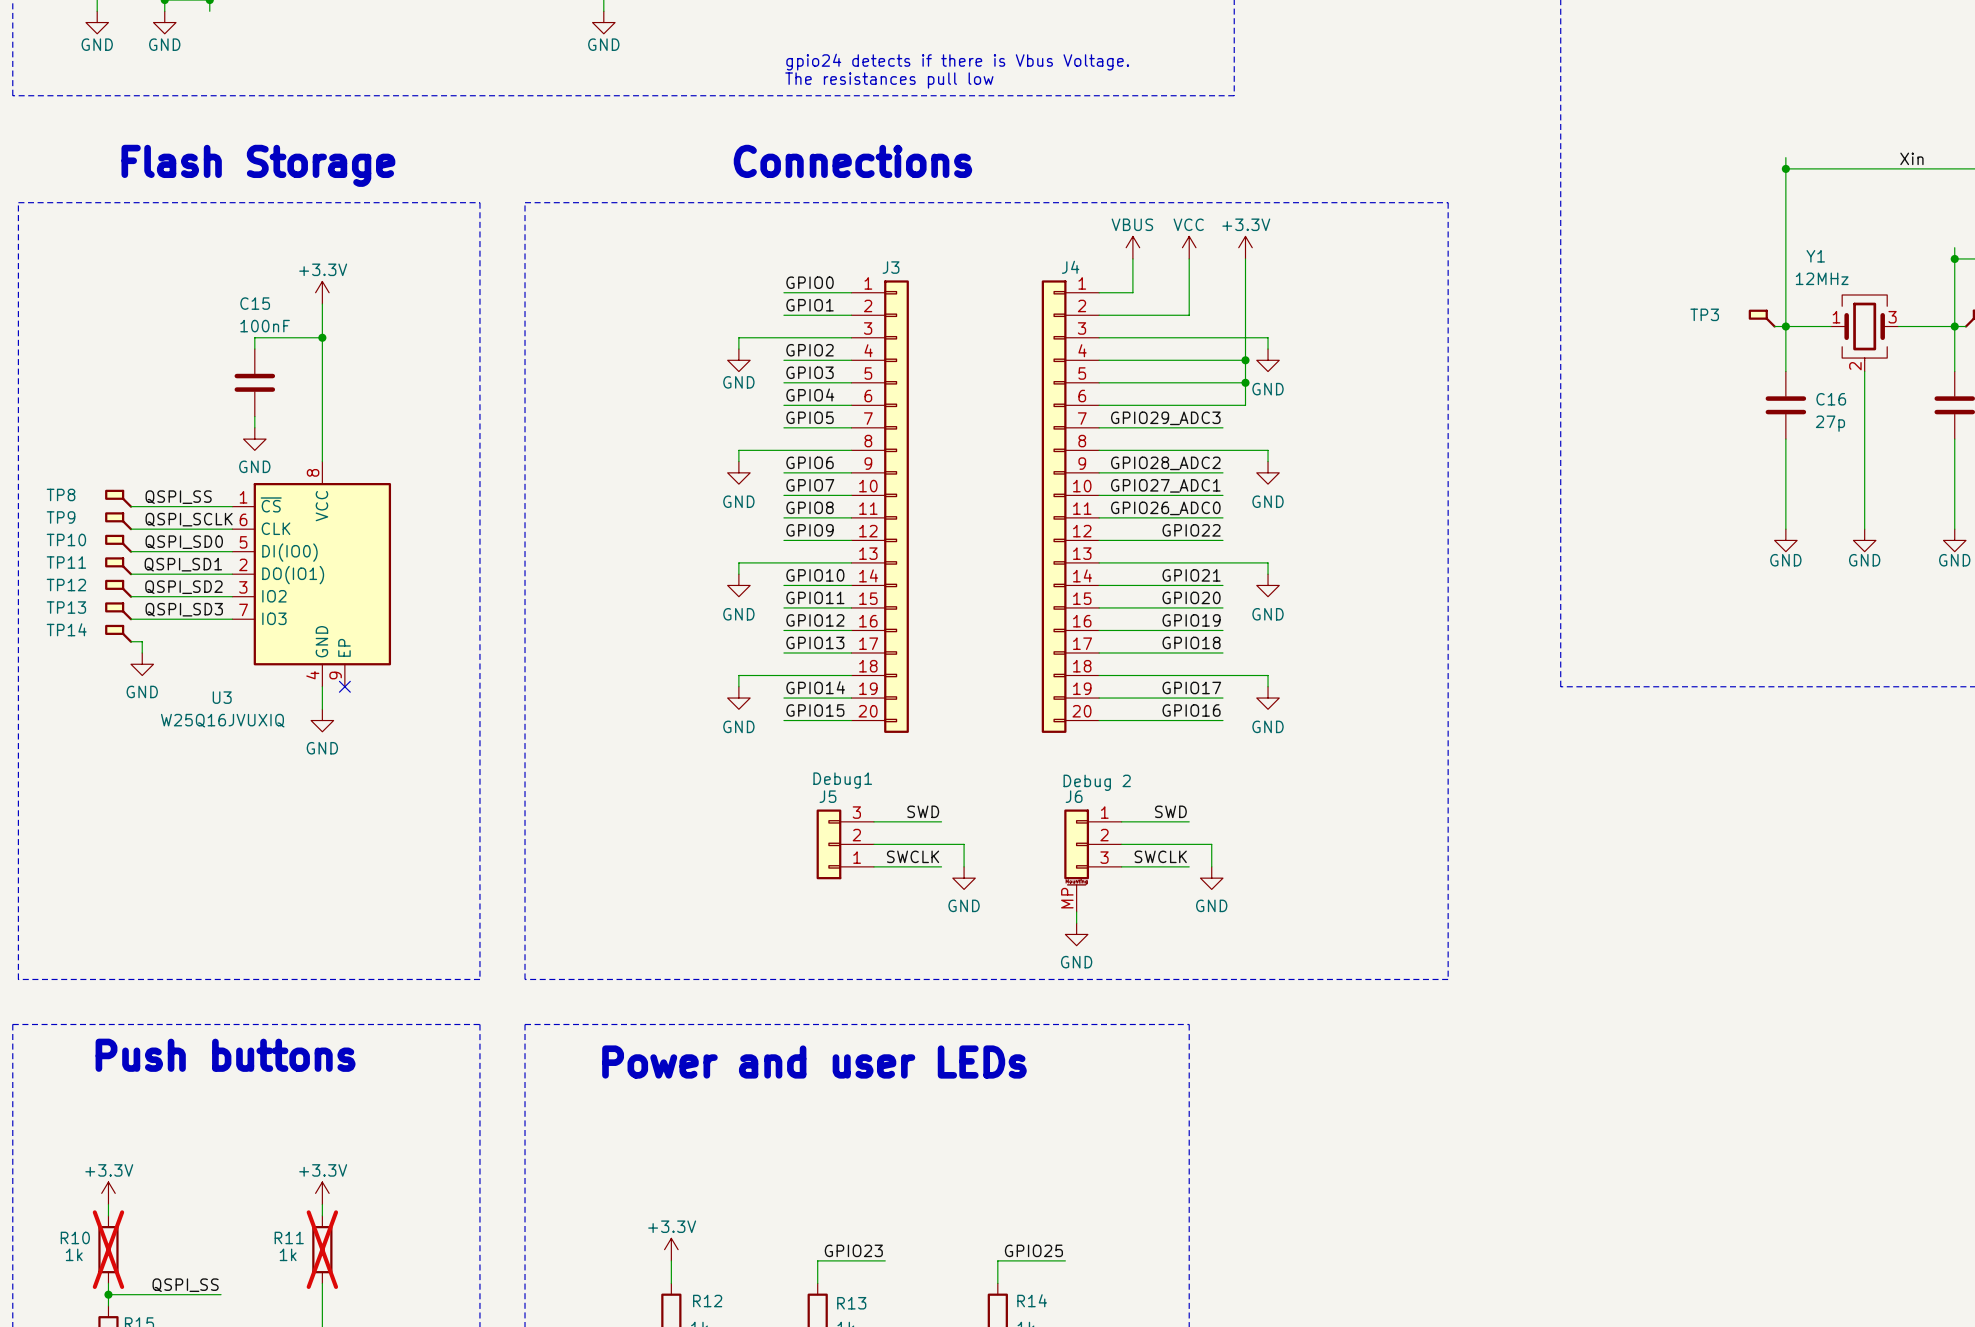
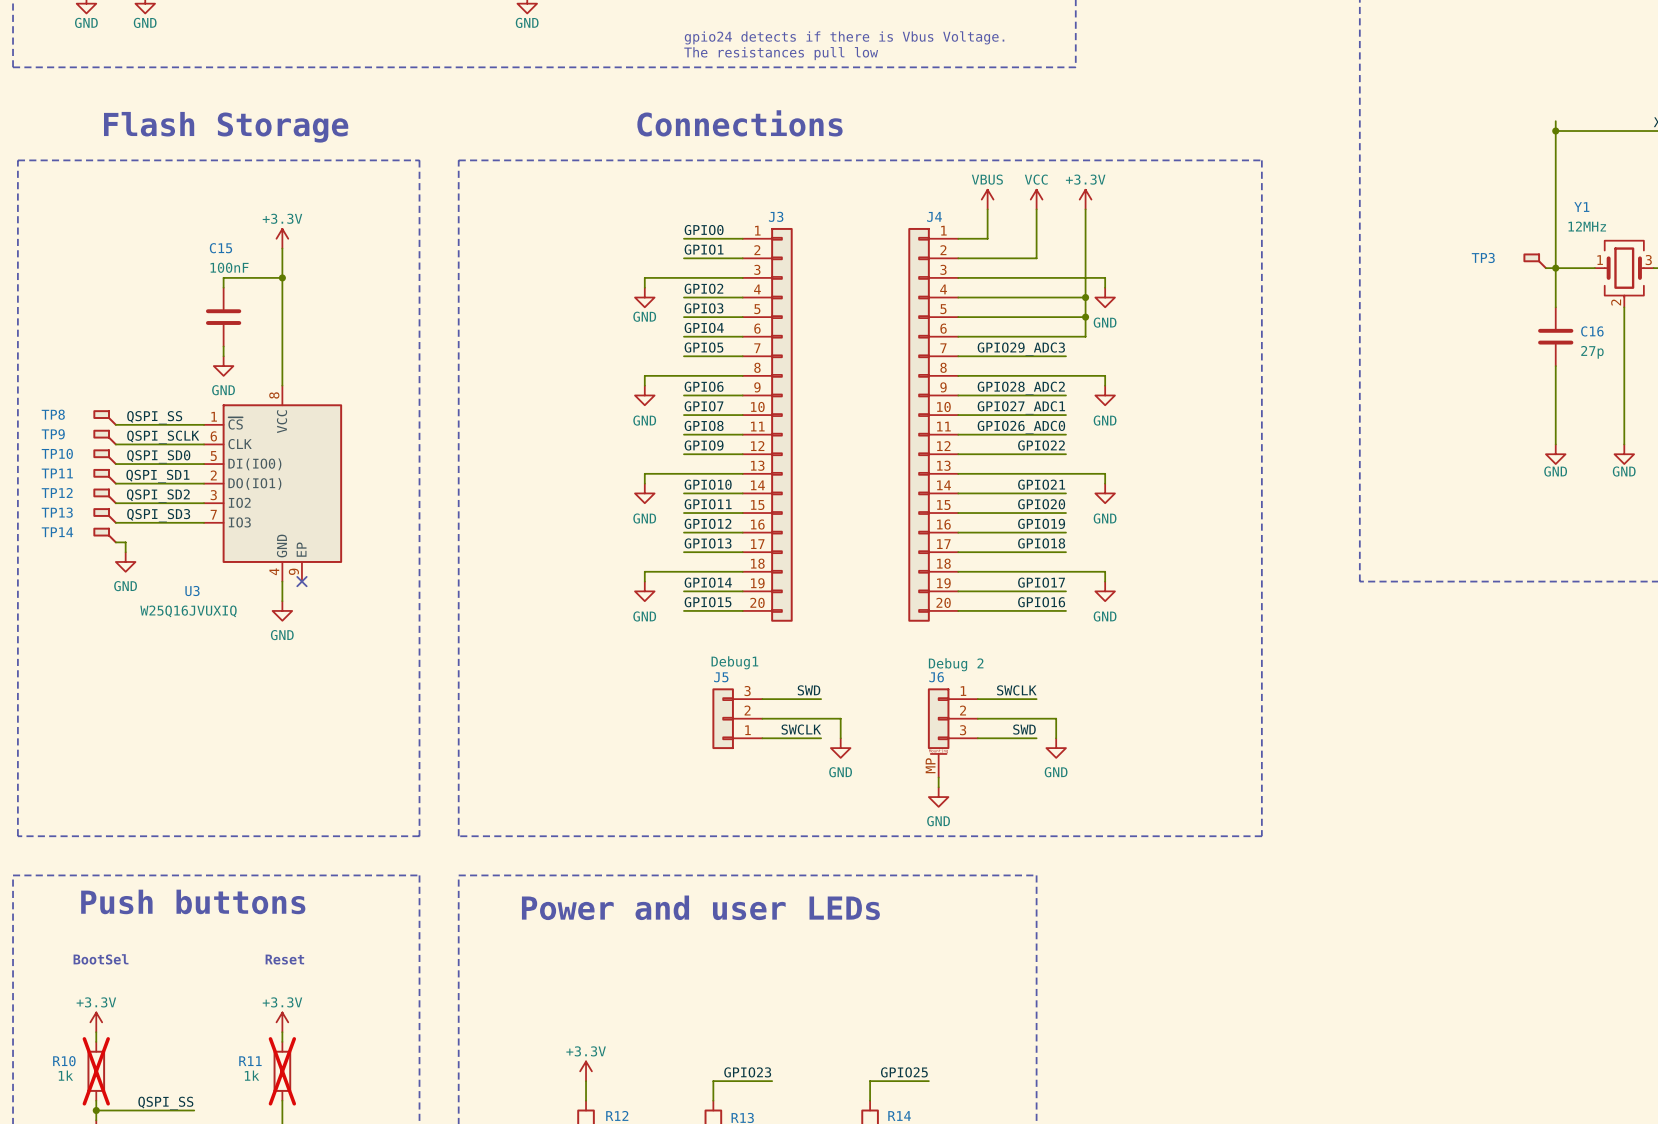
label: SWD (1170, 811) -> SWCLK (1016, 690)
label: SWCLK (1160, 856) -> SWD (1024, 729)
text: none -> BootSel (101, 959)
text: none -> Reset (284, 959)

